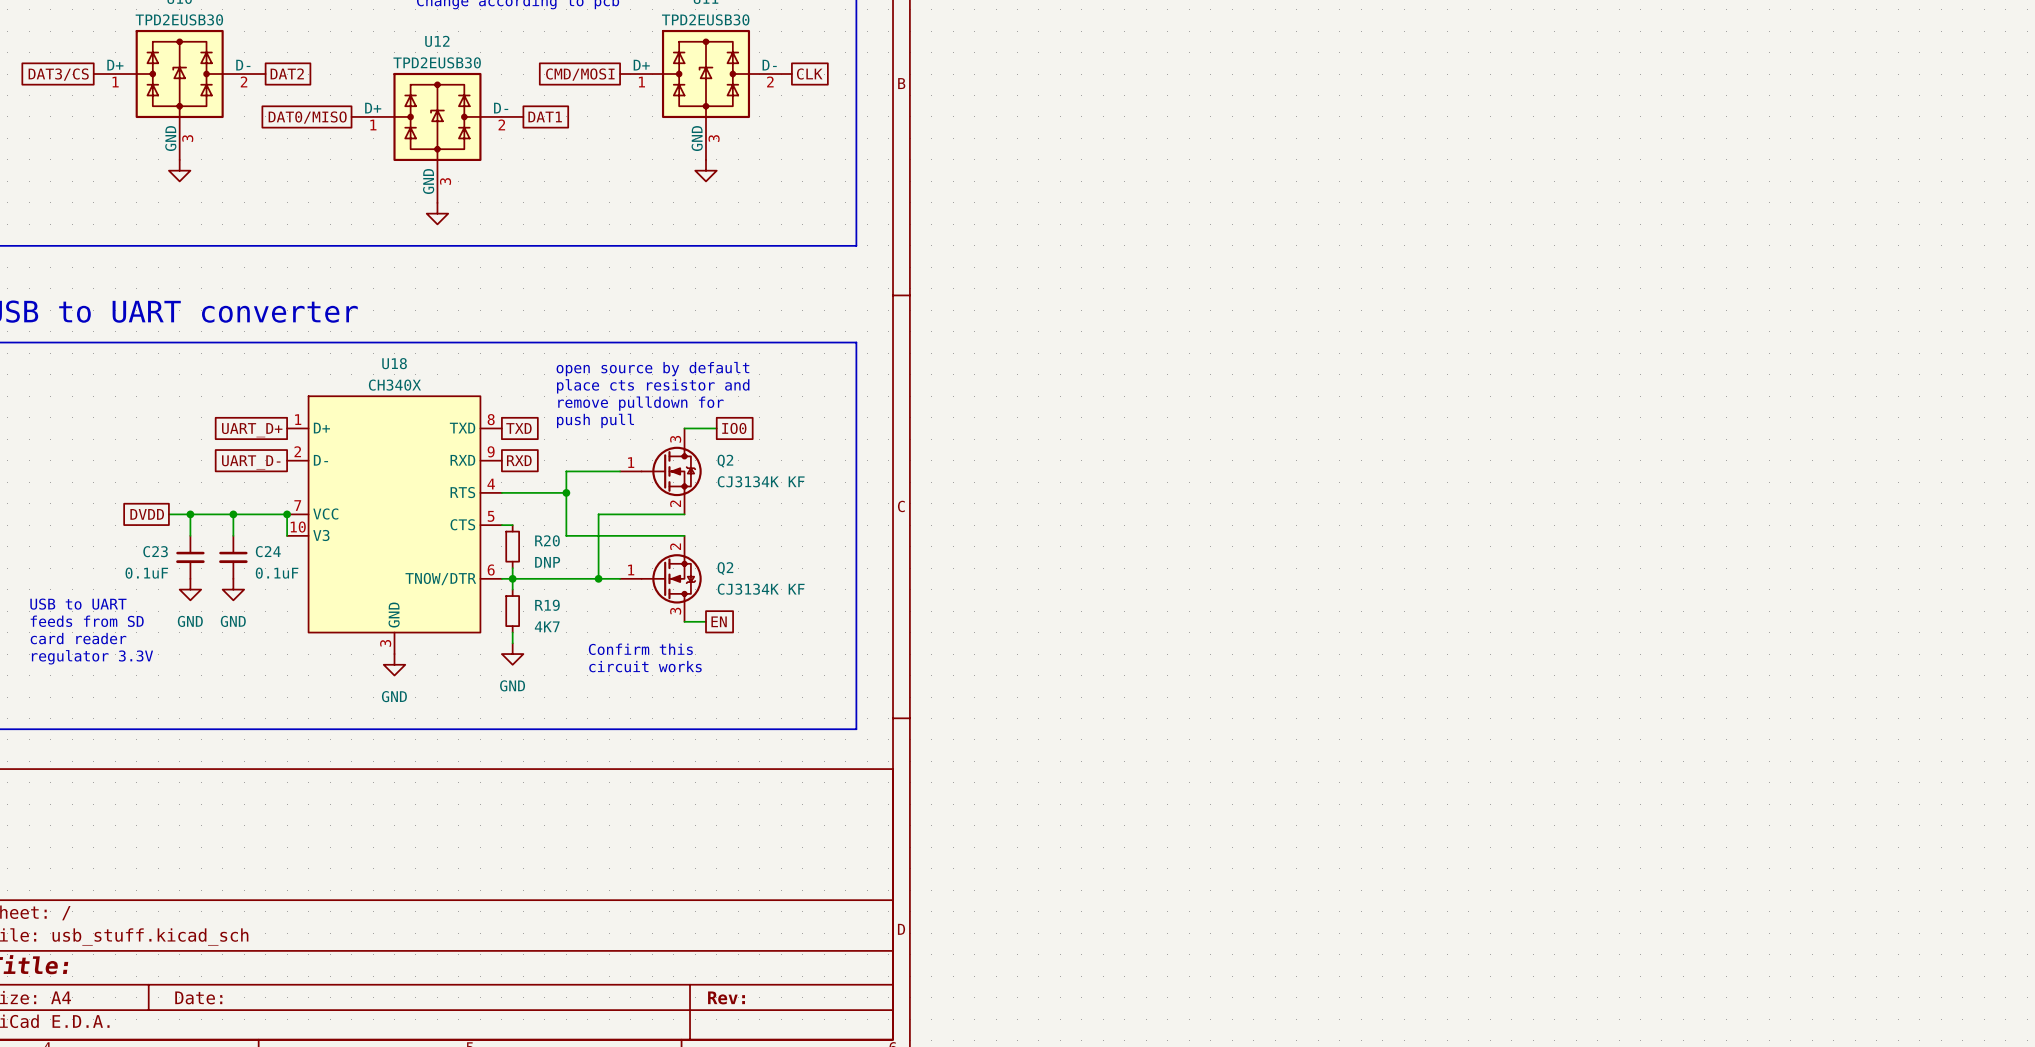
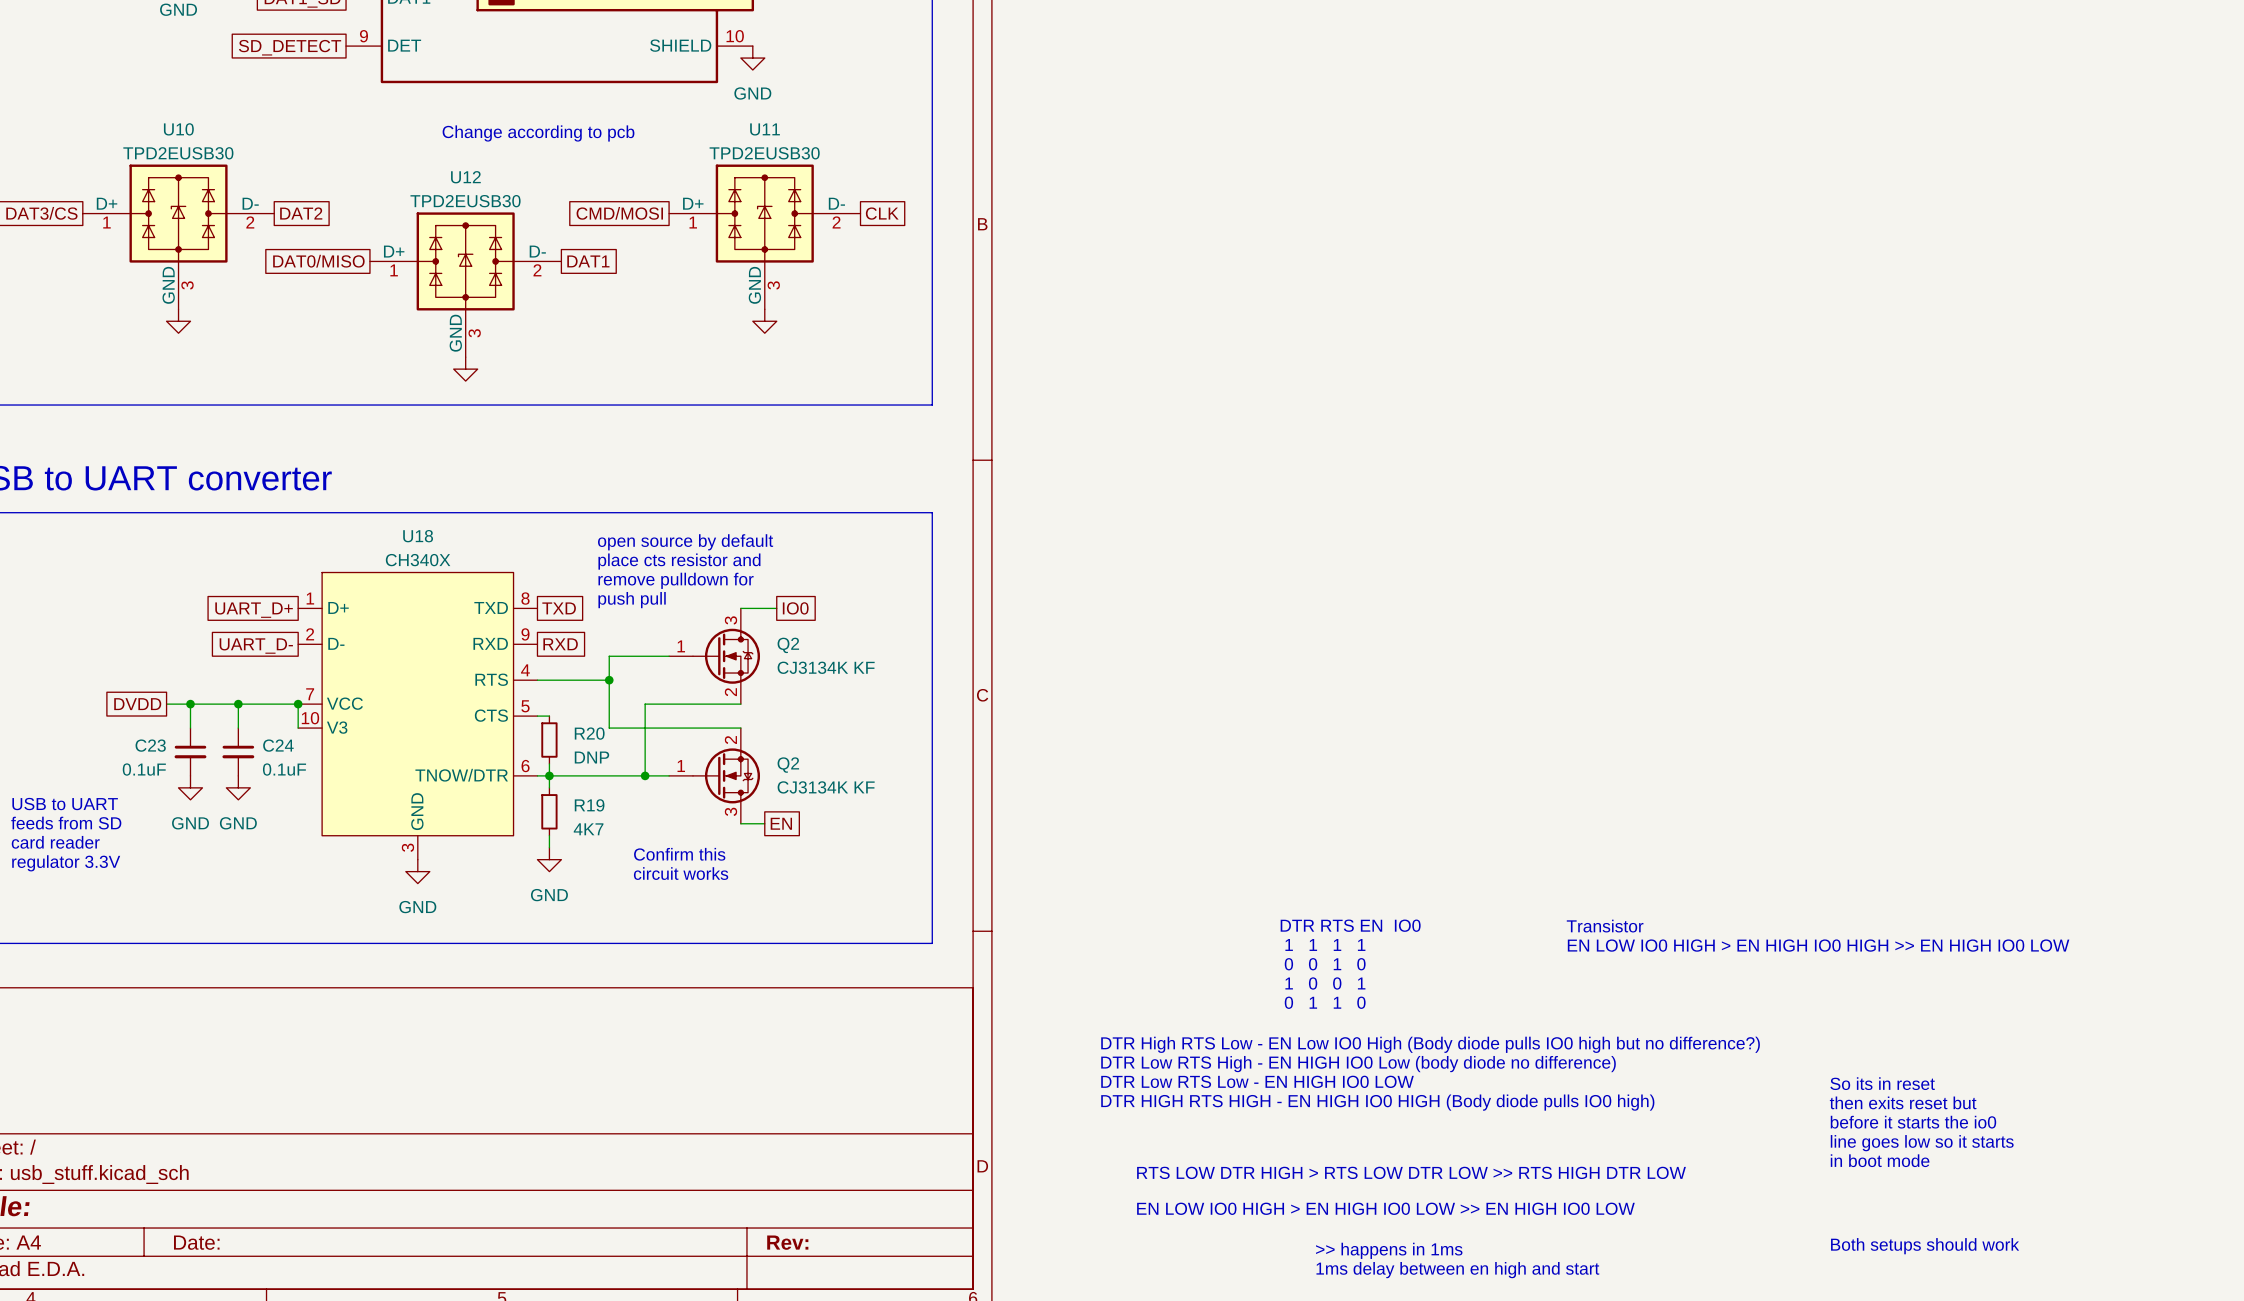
text: none -> DTR RTS EN IO0 (1350, 925)
text: none -> Transistor (1605, 926)
text: none -> 1 1 1 1 (1325, 944)
text: none -> EN LOW IO0 HIGH > EN HIGH IO0 HIGH >> EN HIGH IO0 LOW (1818, 945)
text: none -> 0 0 1 0 (1325, 964)
text: none -> 1 0 0 1 (1325, 983)
text: none -> 0 1 1 0 (1325, 1002)
text: none -> DTR High RTS Low - EN Low IO0 High (Body diode pulls IO0 high but no difference?) (1430, 1044)
text: none -> DTR Low RTS High - EN HIGH IO0 Low (body diode no difference) (1358, 1064)
text: none -> DTR Low RTS Low - EN HIGH IO0 LOW (1257, 1081)
text: none -> So its in reset (1882, 1083)
text: none -> DTR HIGH RTS HIGH - EN HIGH IO0 HIGH (Body diode pulls IO0 high) (1377, 1102)
text: none -> then exits reset but (1903, 1102)
text: none -> before it starts the io0 (1913, 1122)
text: none -> line goes low so it starts (1922, 1143)
text: none -> in boot mode (1880, 1160)
text: none -> RTS LOW DTR HIGH > RTS LOW DTR LOW >> RTS HIGH DTR LOW (1411, 1172)
text: none -> EN LOW IO0 HIGH > EN HIGH IO0 LOW >> EN HIGH IO0 LOW (1385, 1208)
text: none -> Both setups should work (1925, 1246)
text: none -> >> happens in 1ms (1389, 1250)
text: none -> 1ms delay between en high and start (1457, 1270)

